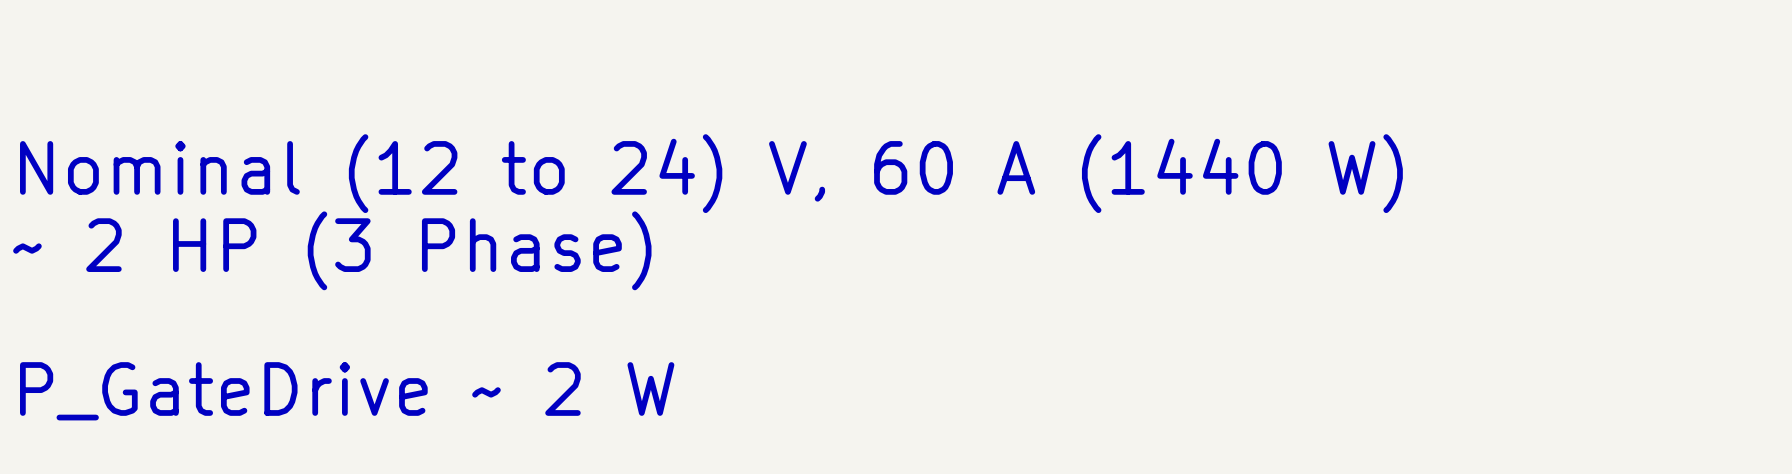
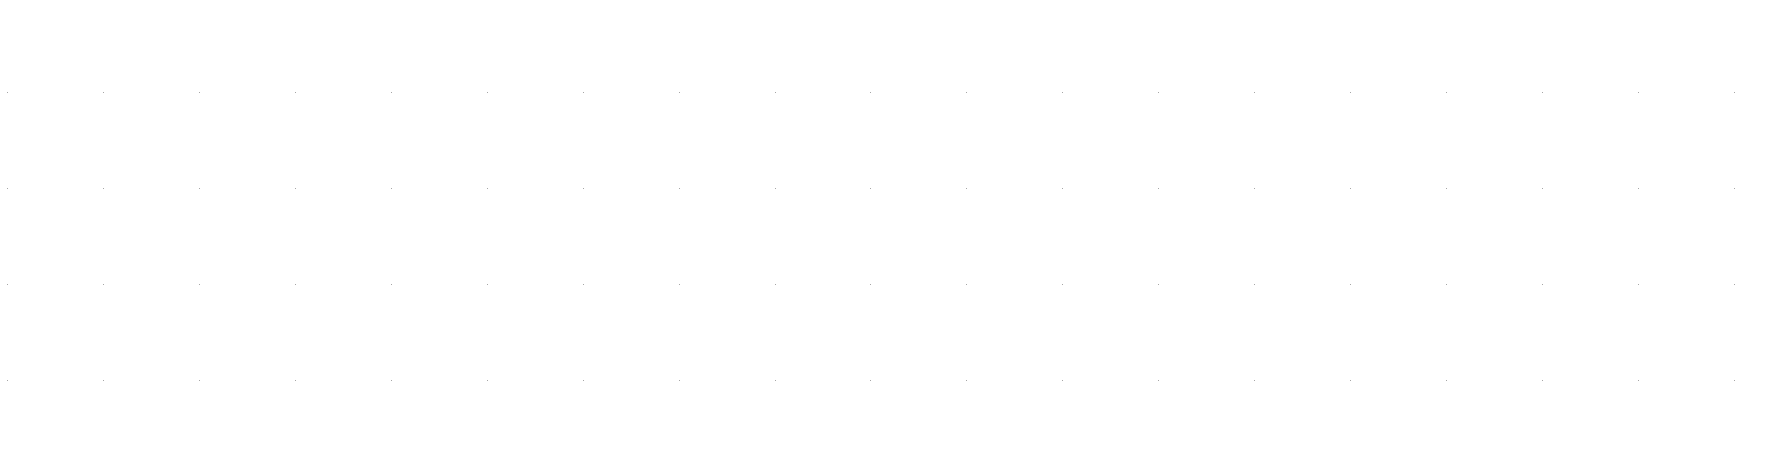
text: Nominal (12 to 24) V, 60 A (1440 W) (711, 173) -> none
text: ~ 2 HP (3 Phase) (332, 250) -> none
text: P_GateDrive ~ 2 W (347, 391) -> none

